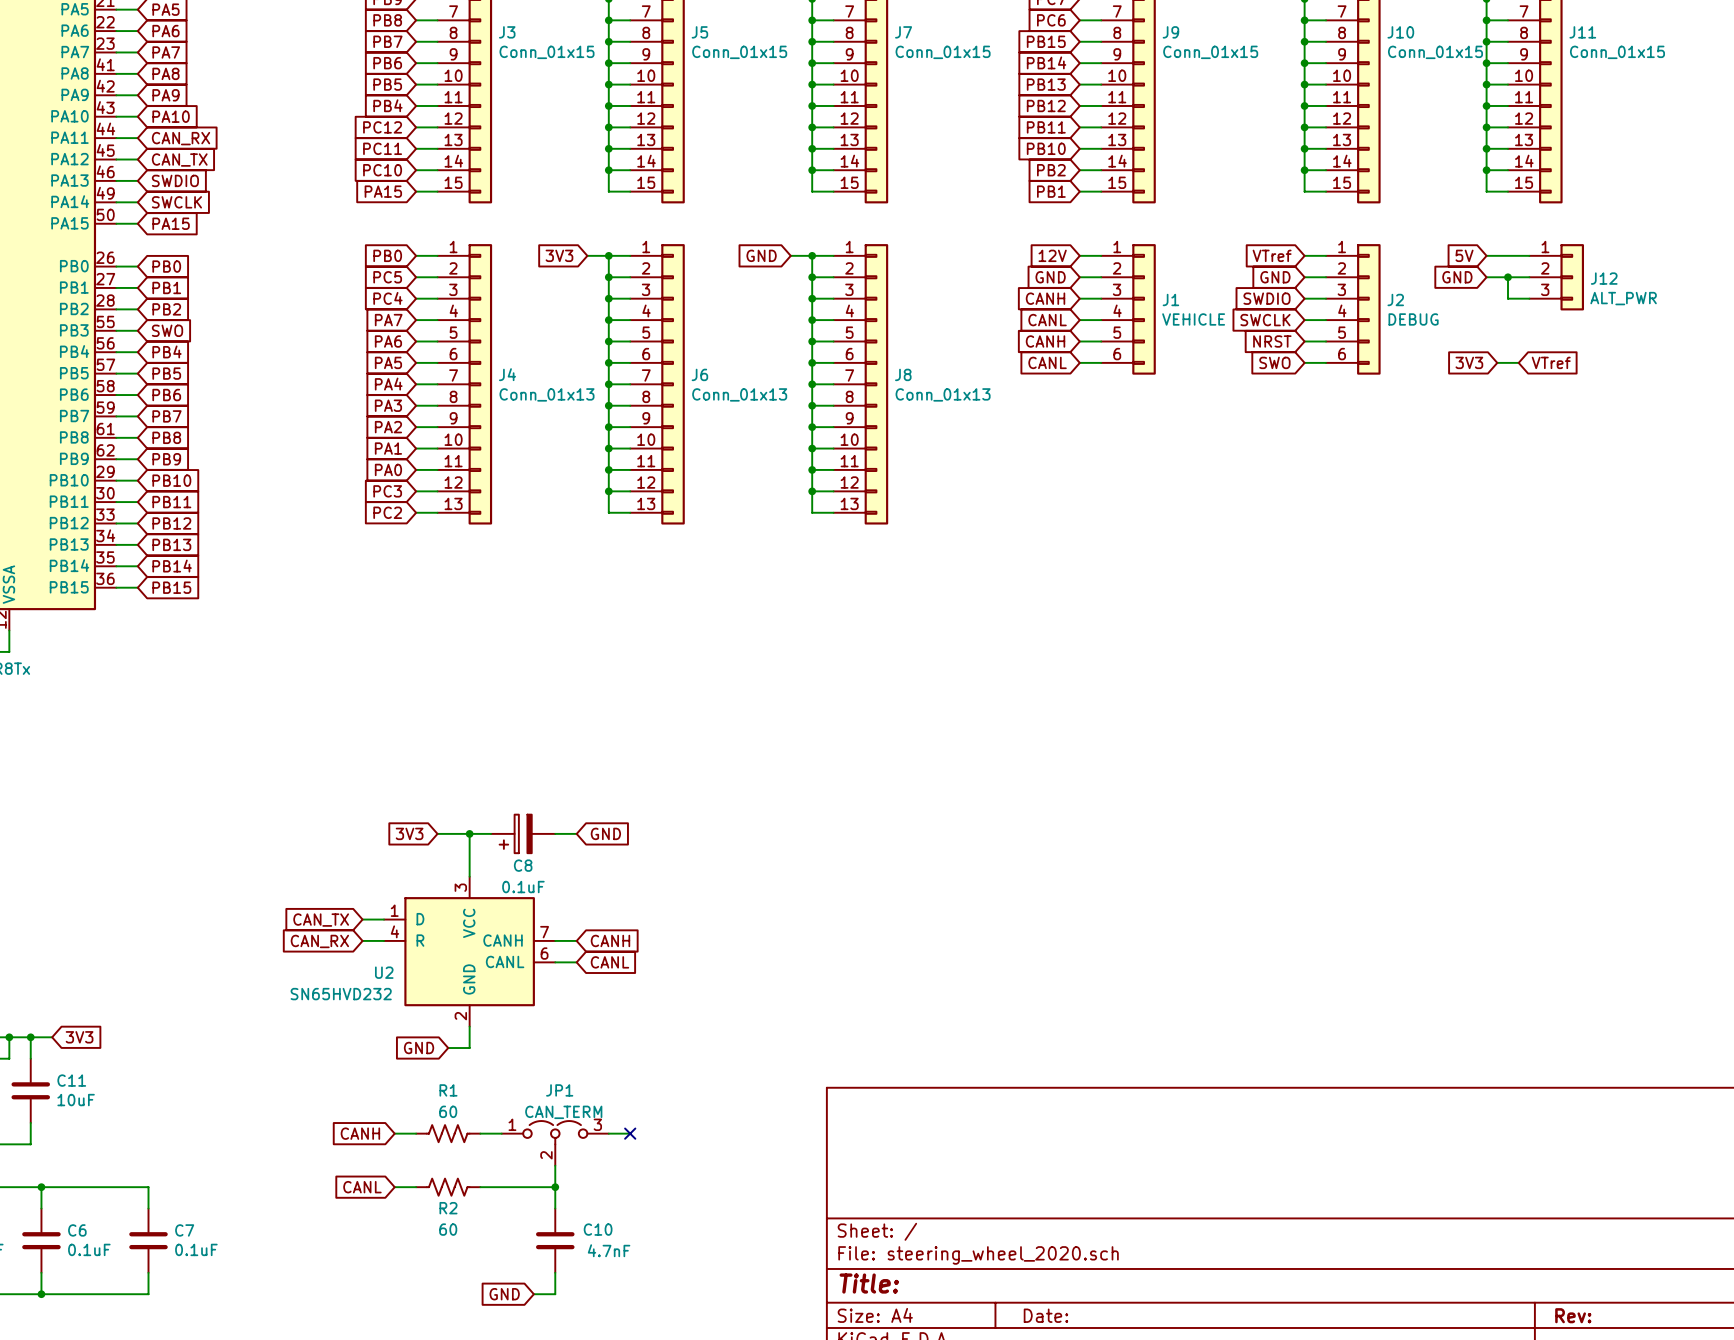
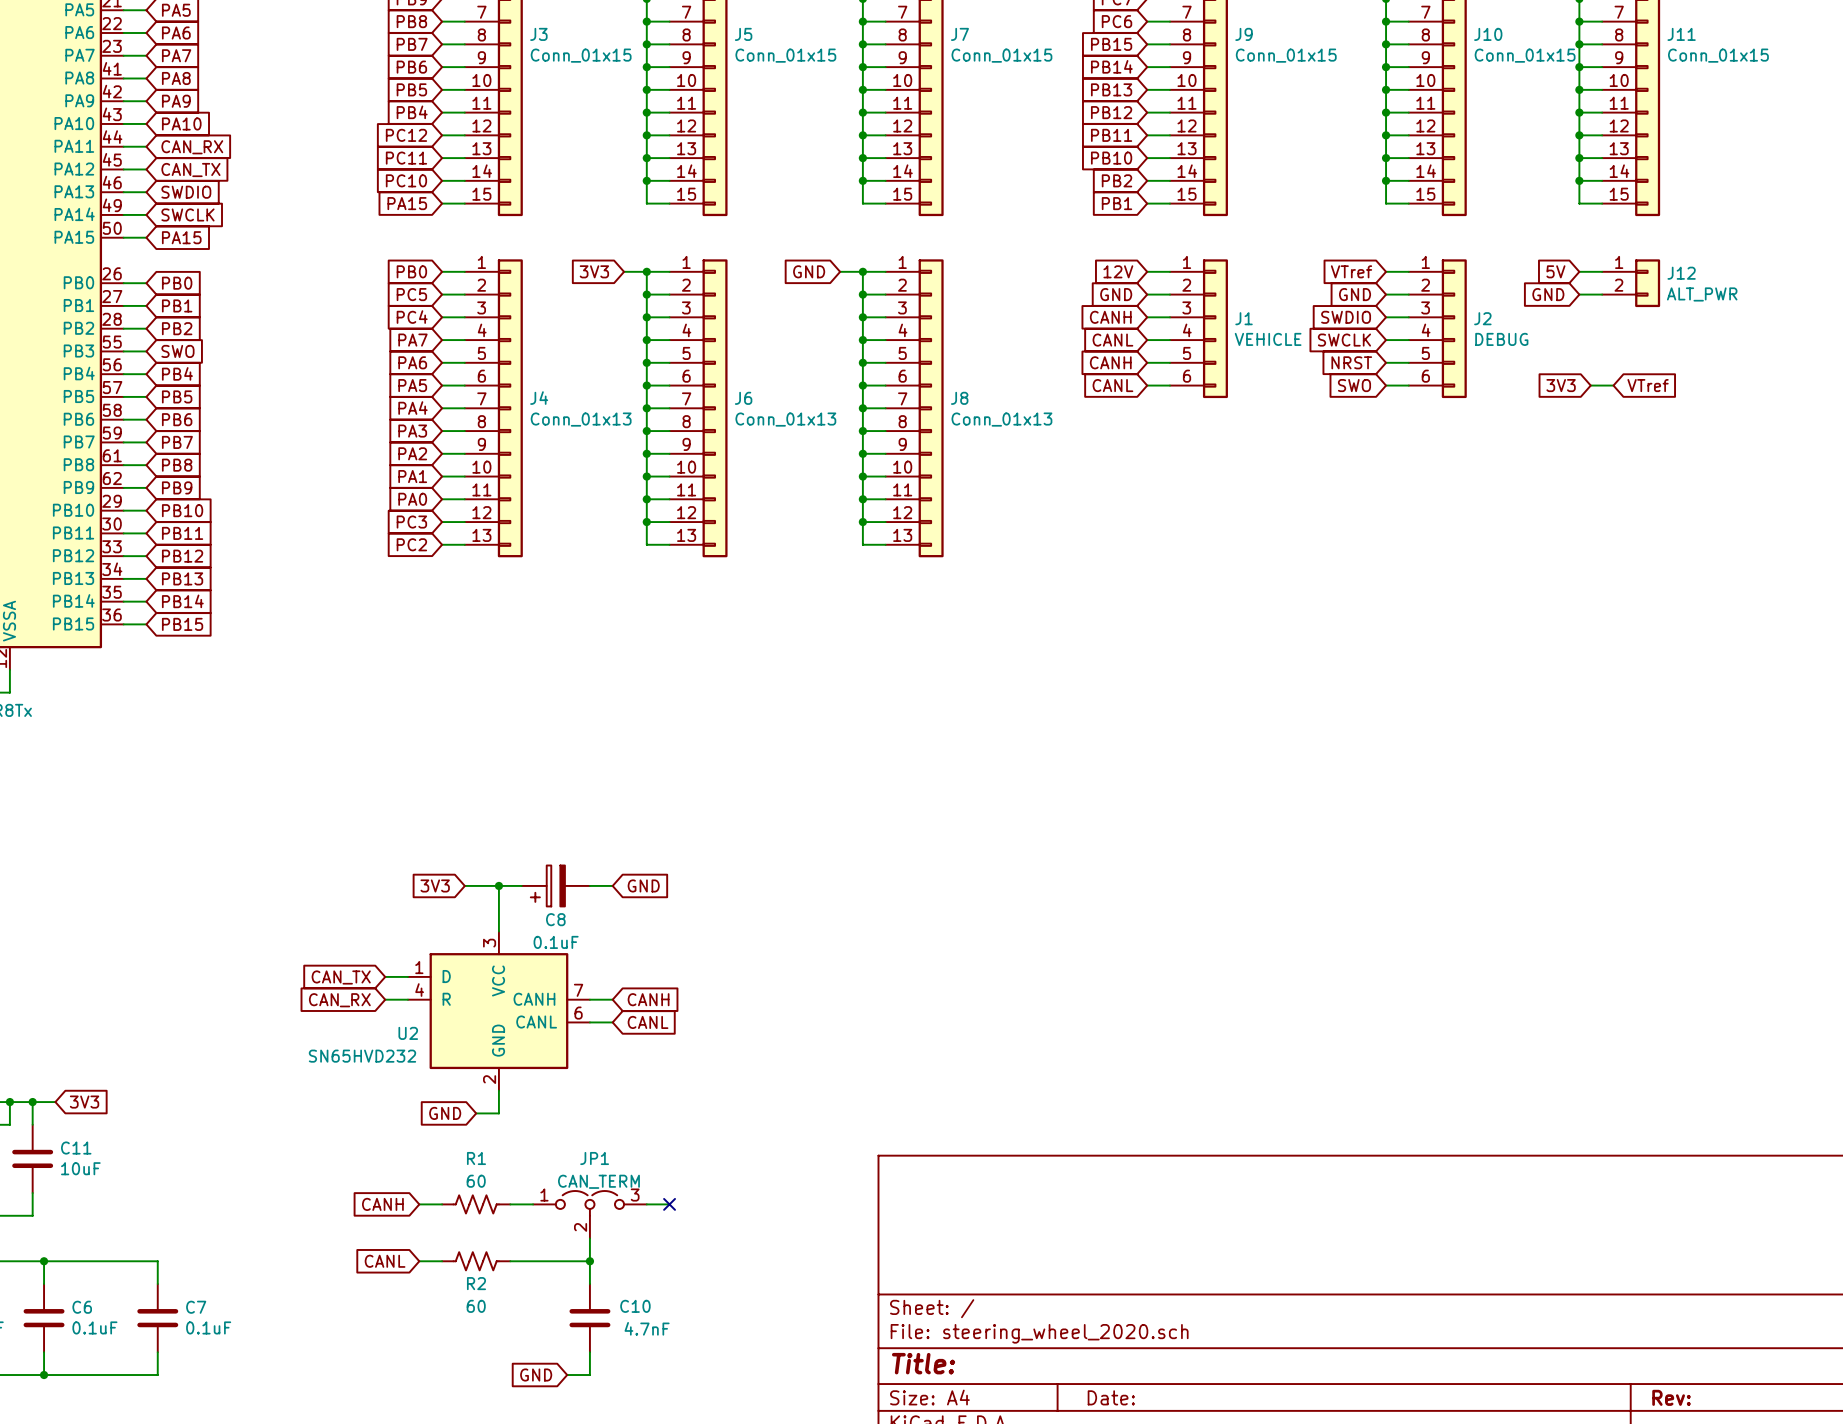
J12 symbol: [1529, 244, 1585, 311] -> [1602, 259, 1661, 308]
junction: (1508, 277) -> none
wire: (1529, 277) (1508, 277) (1508, 298) (1529, 298) -> none

